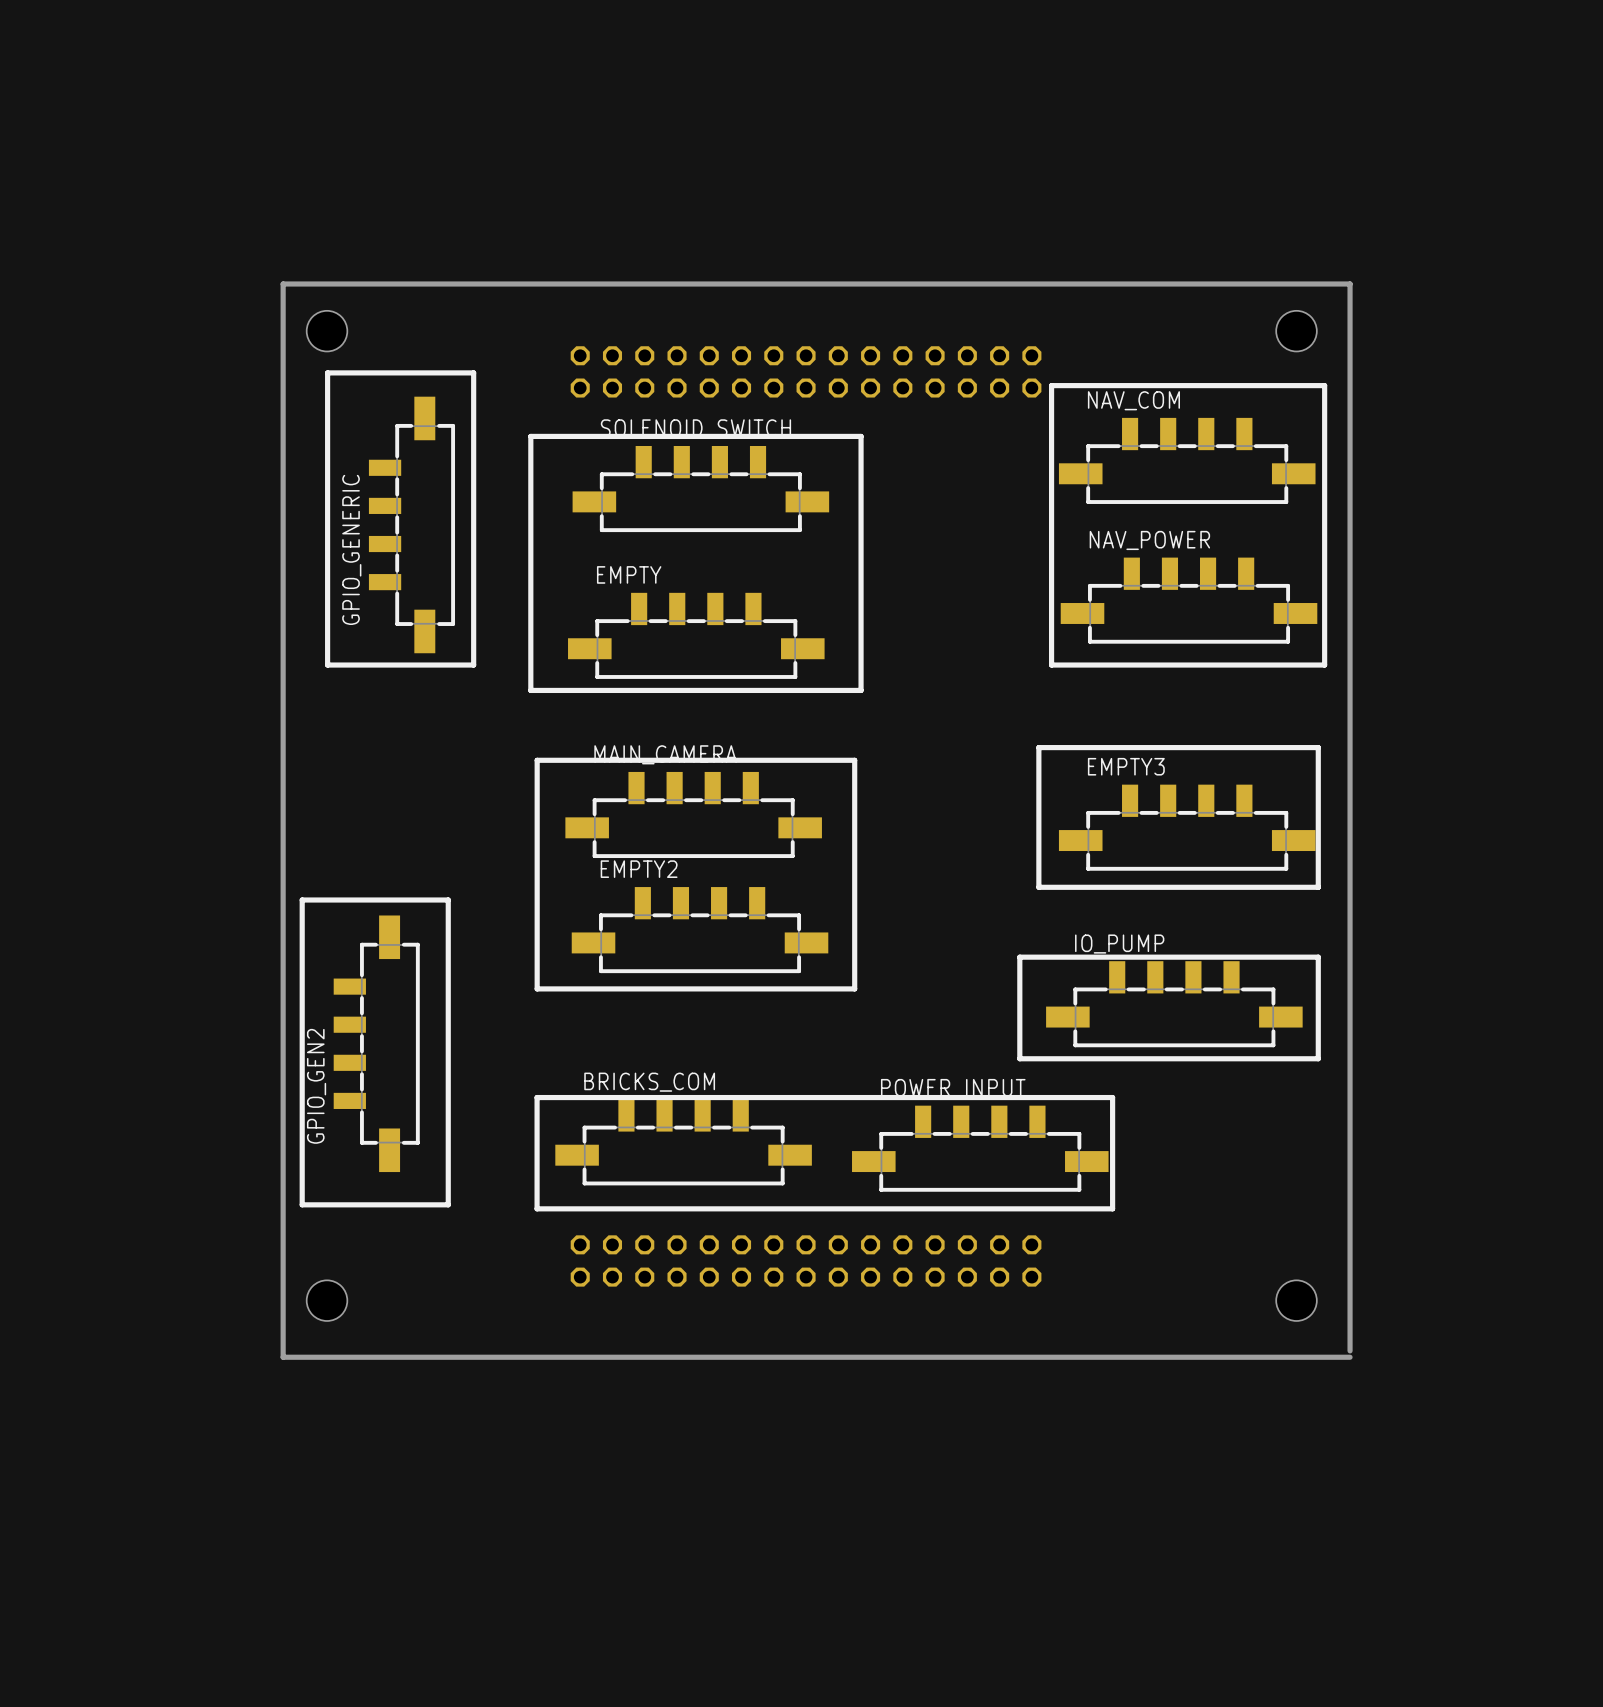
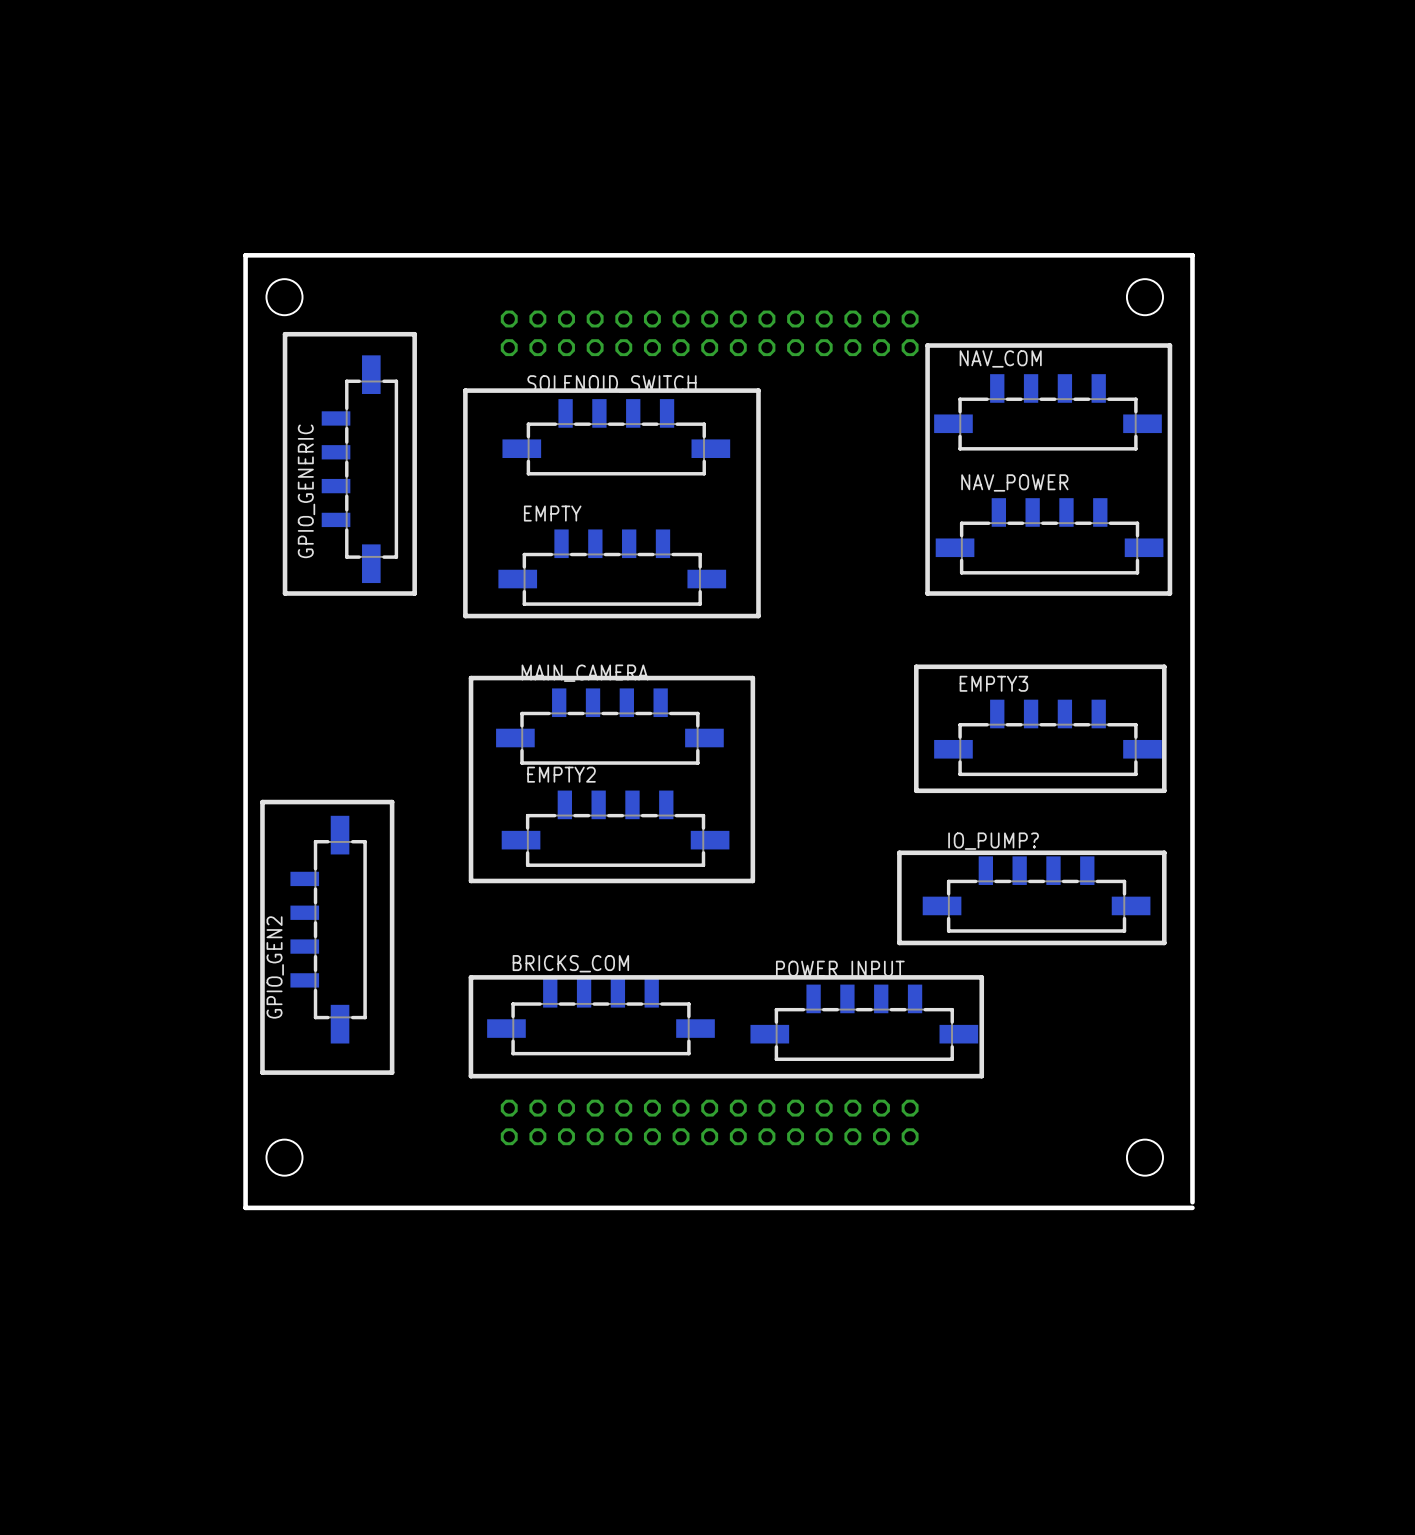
IO_PUMP name: IO_PUMP (1119, 944) -> IO_PUMP? (993, 841)

